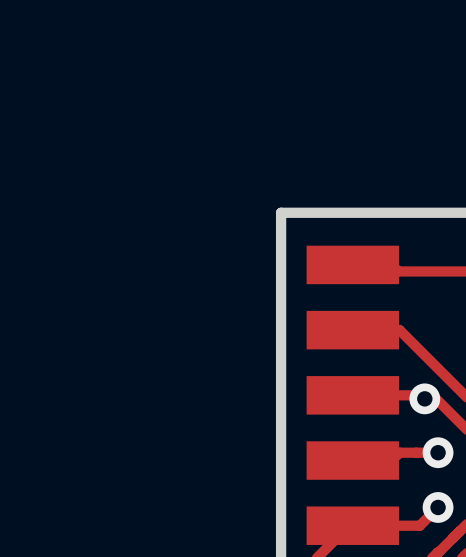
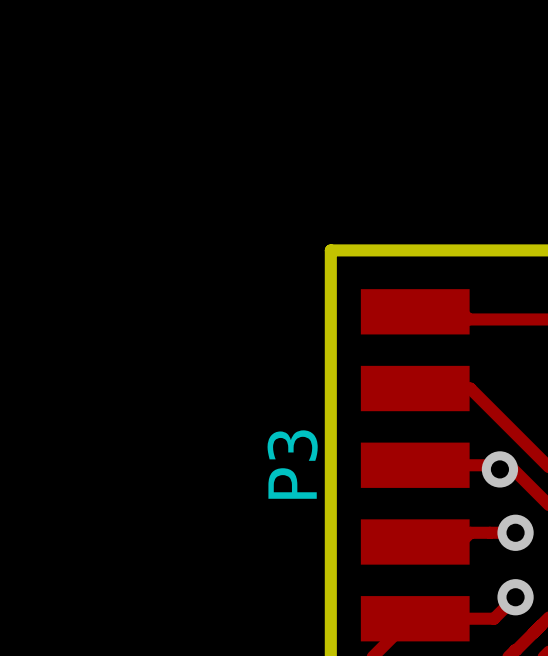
P3 name: none -> P3 (292, 464)

